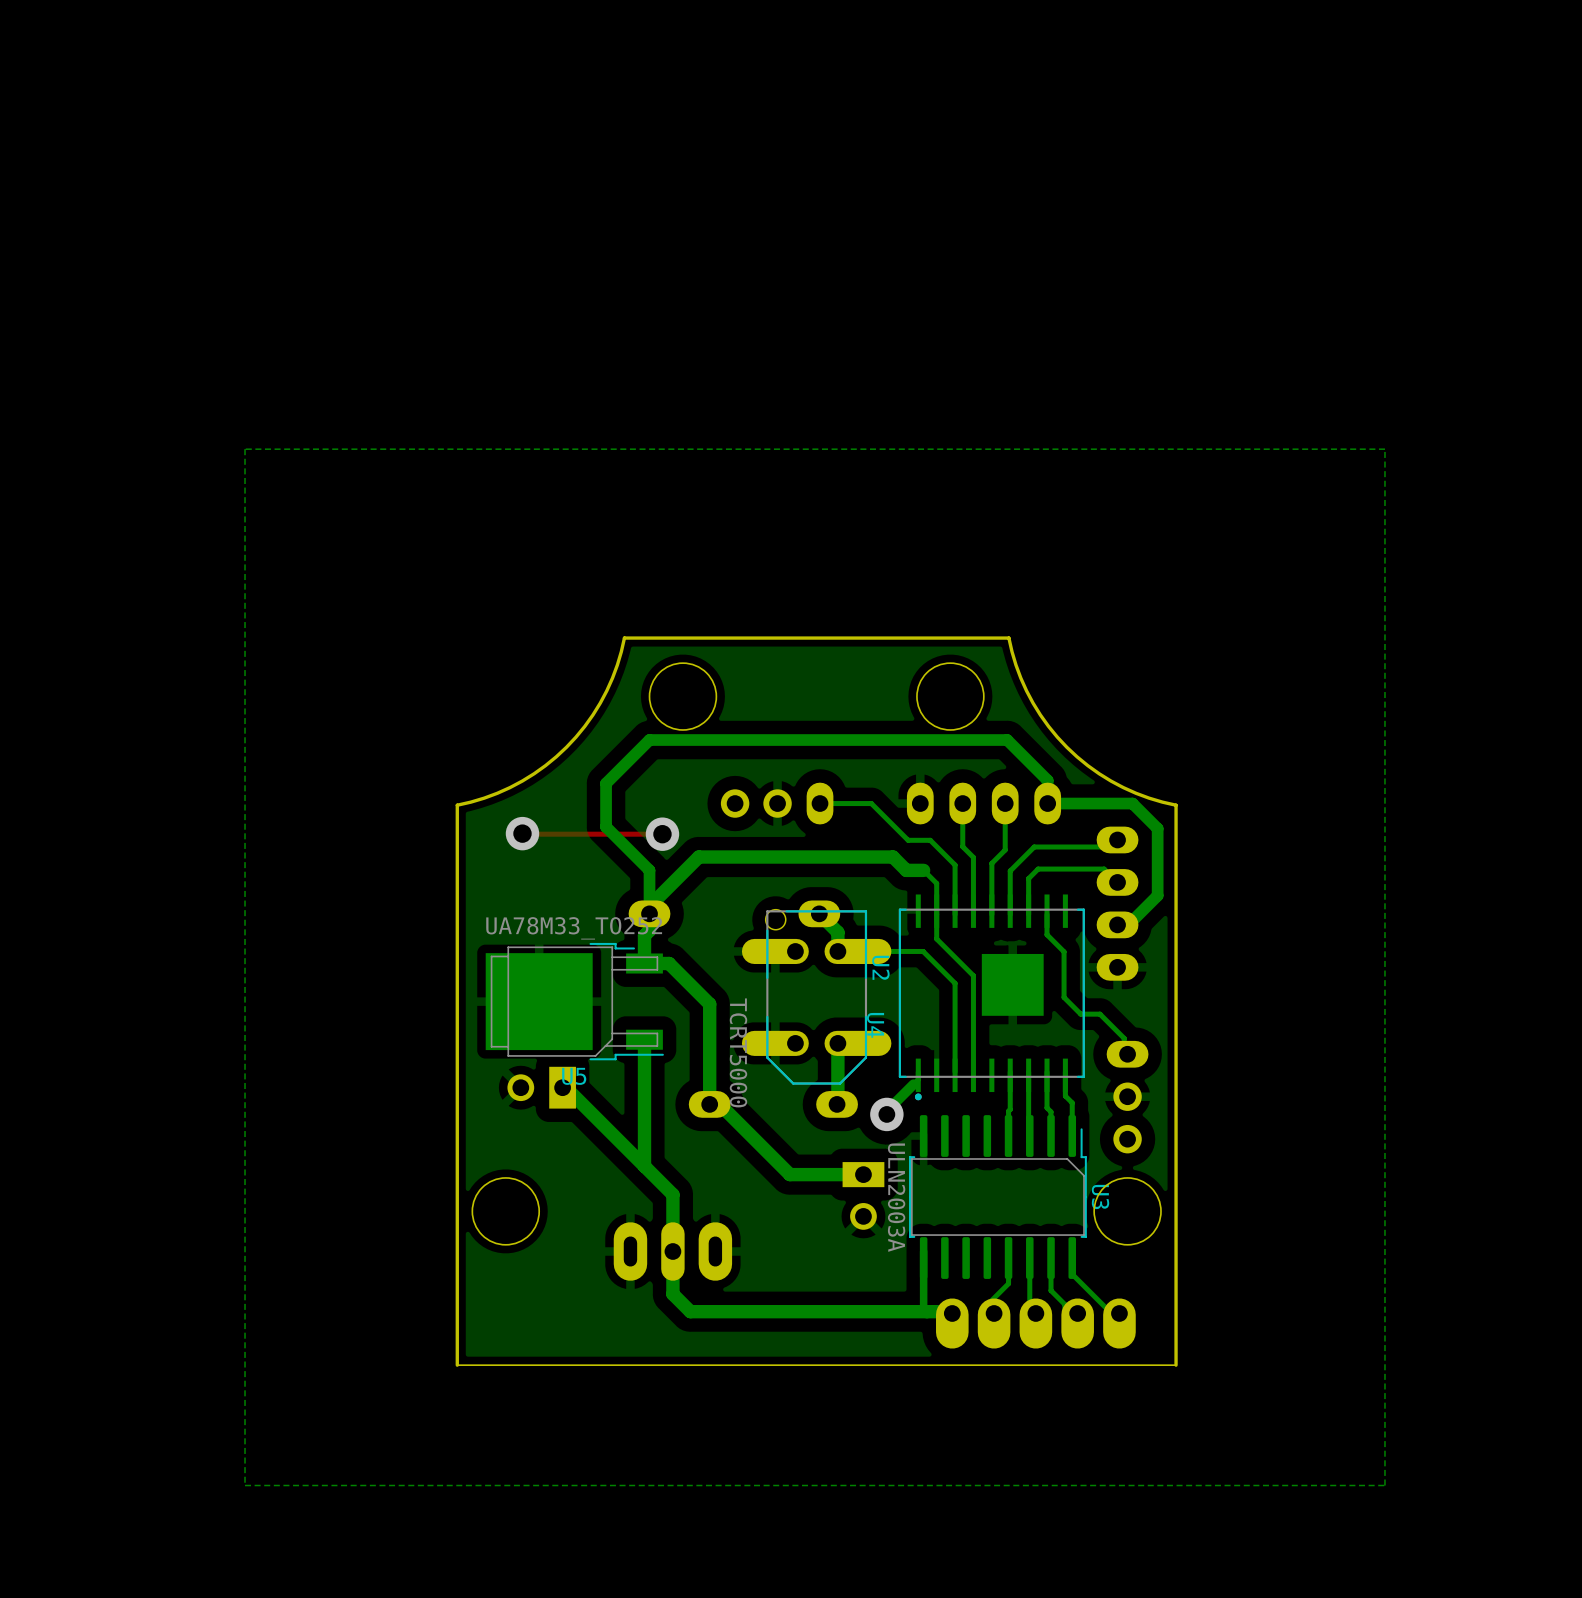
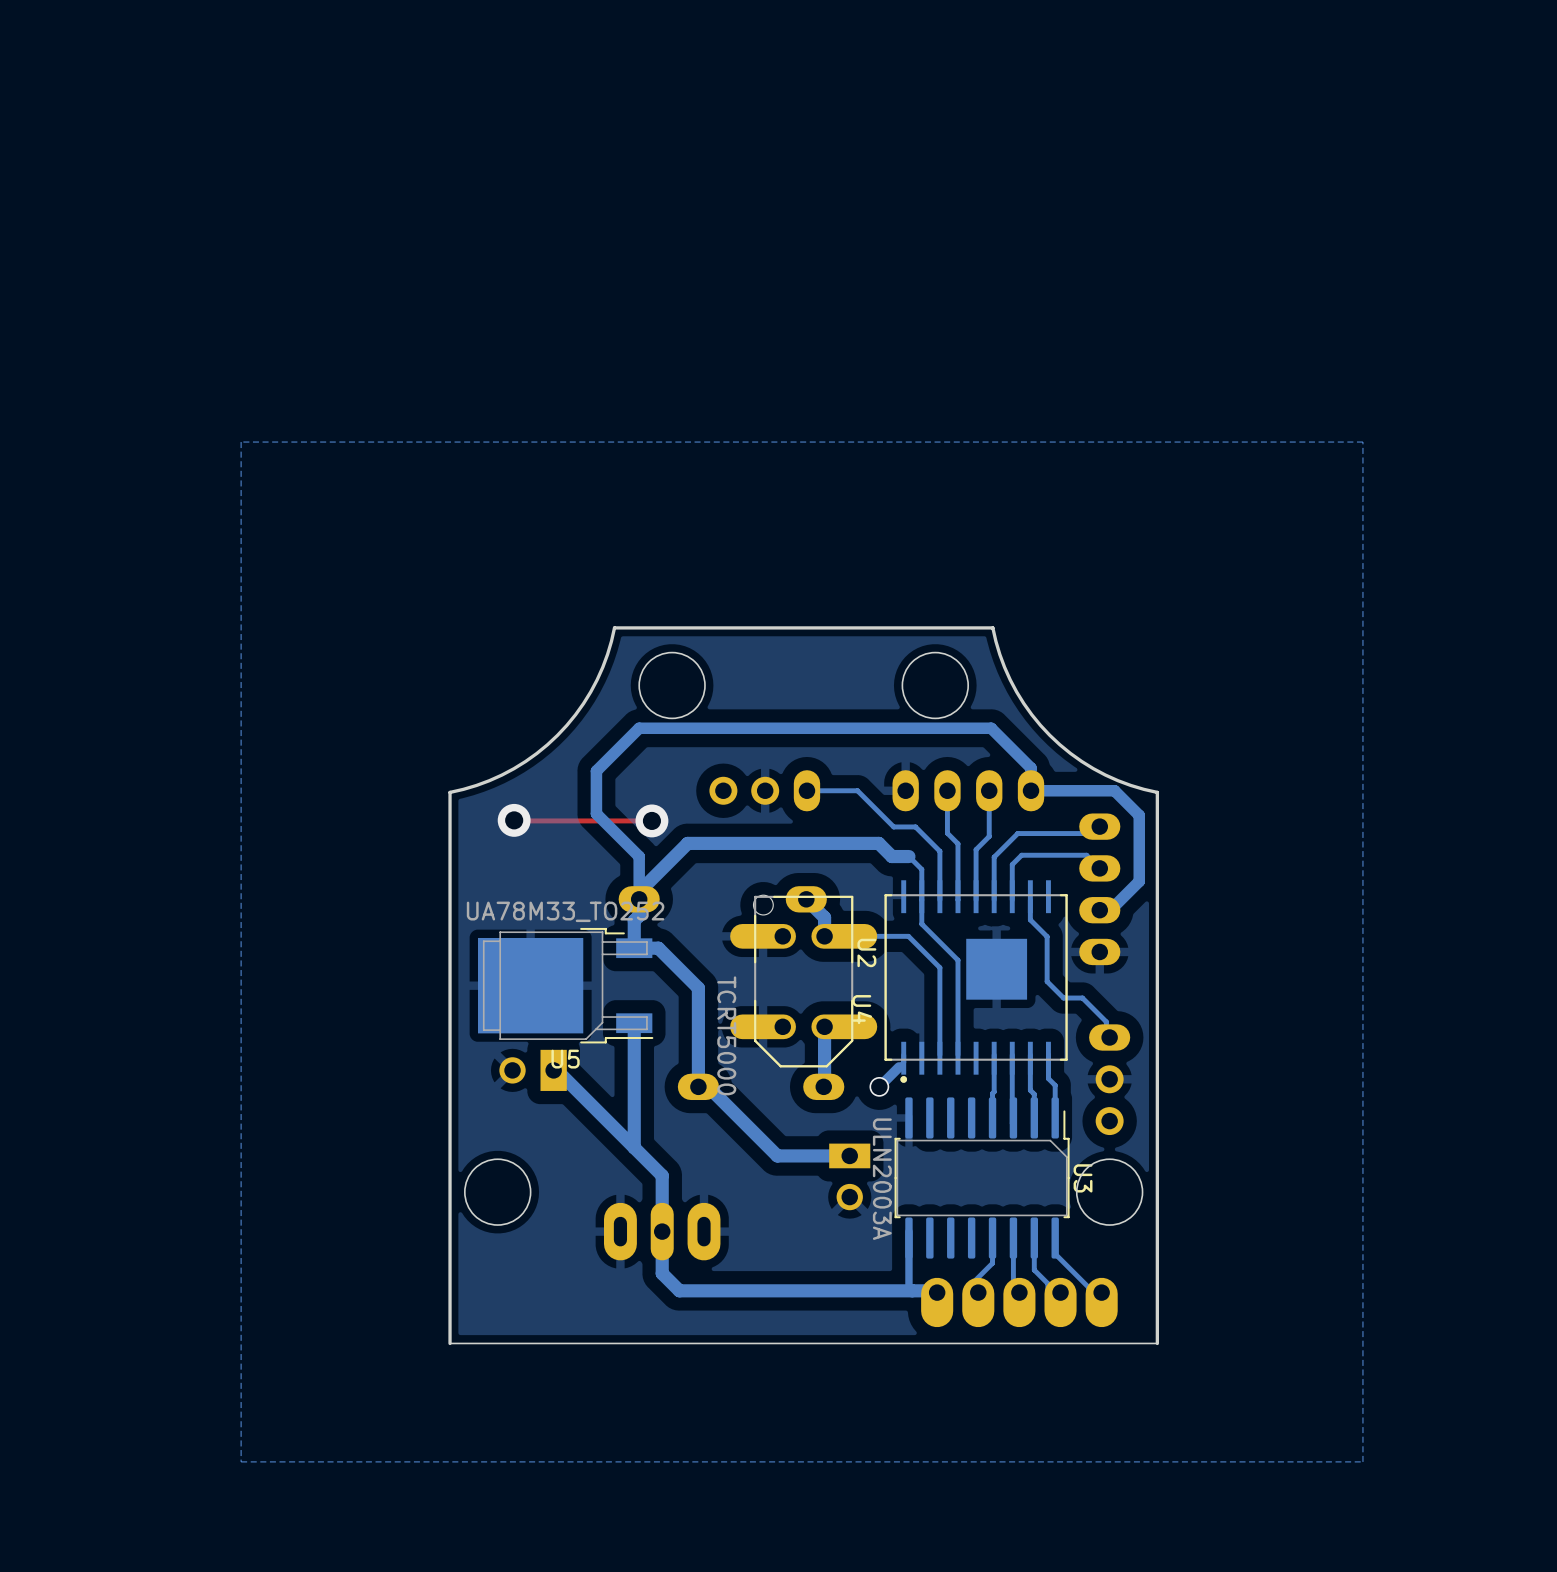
via size: [870, 1097, 904, 1132] -> [869, 1076, 890, 1097]

